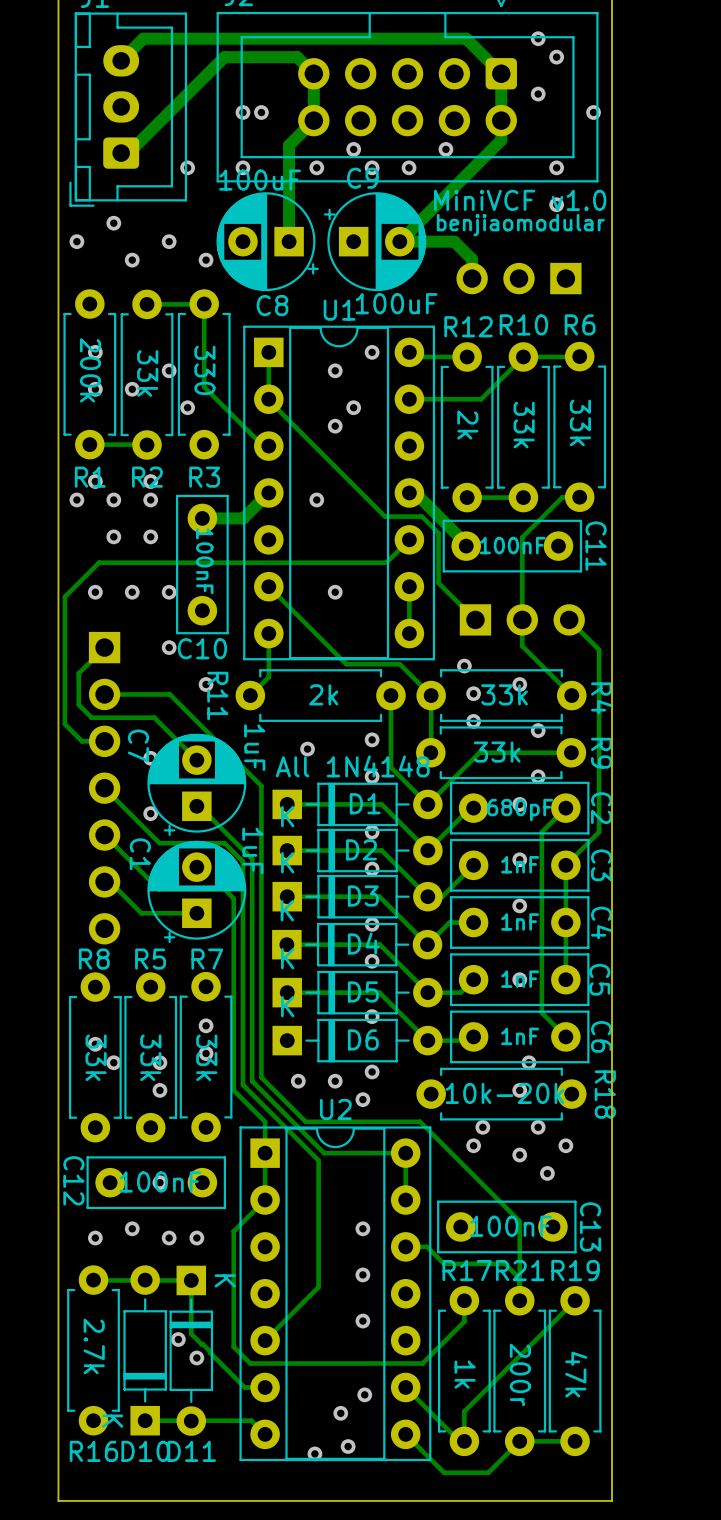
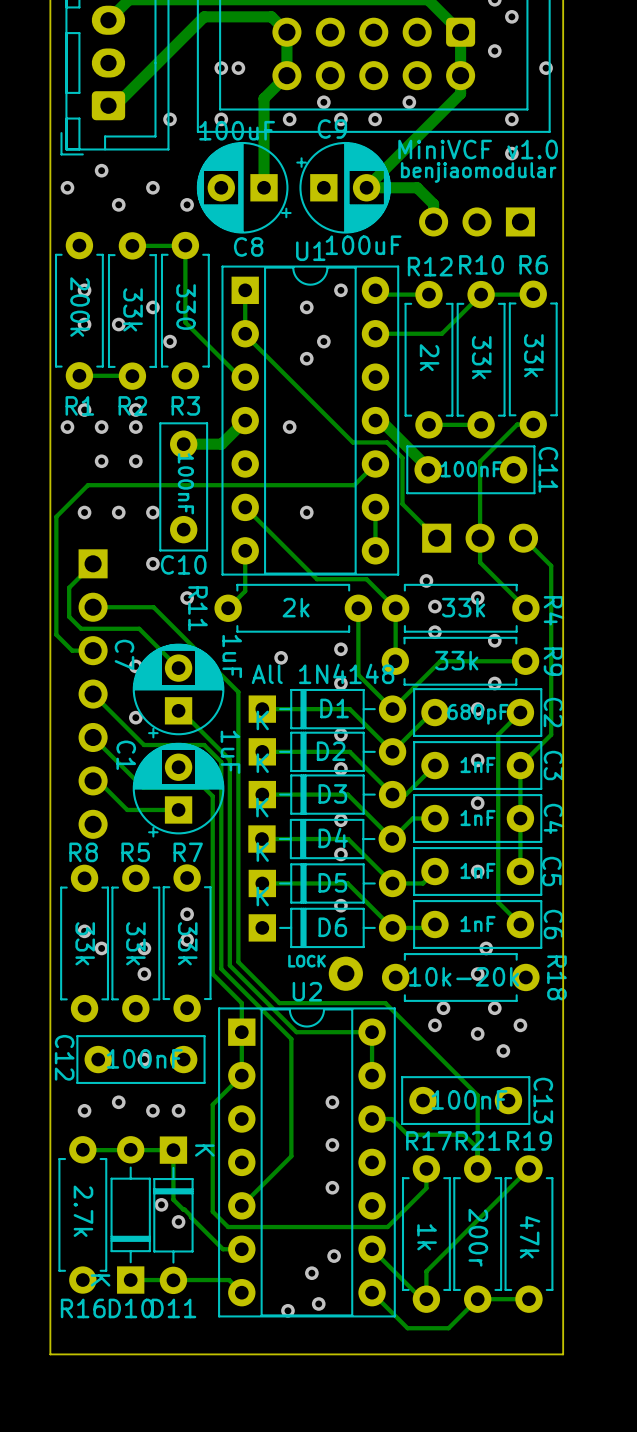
via: (372, 1071) -> none
text: none -> LOCK (307, 961)
via: (298, 1081) -> none
via: (335, 1081) -> none
part: none -> (345, 973)
via: (362, 1099) -> none

